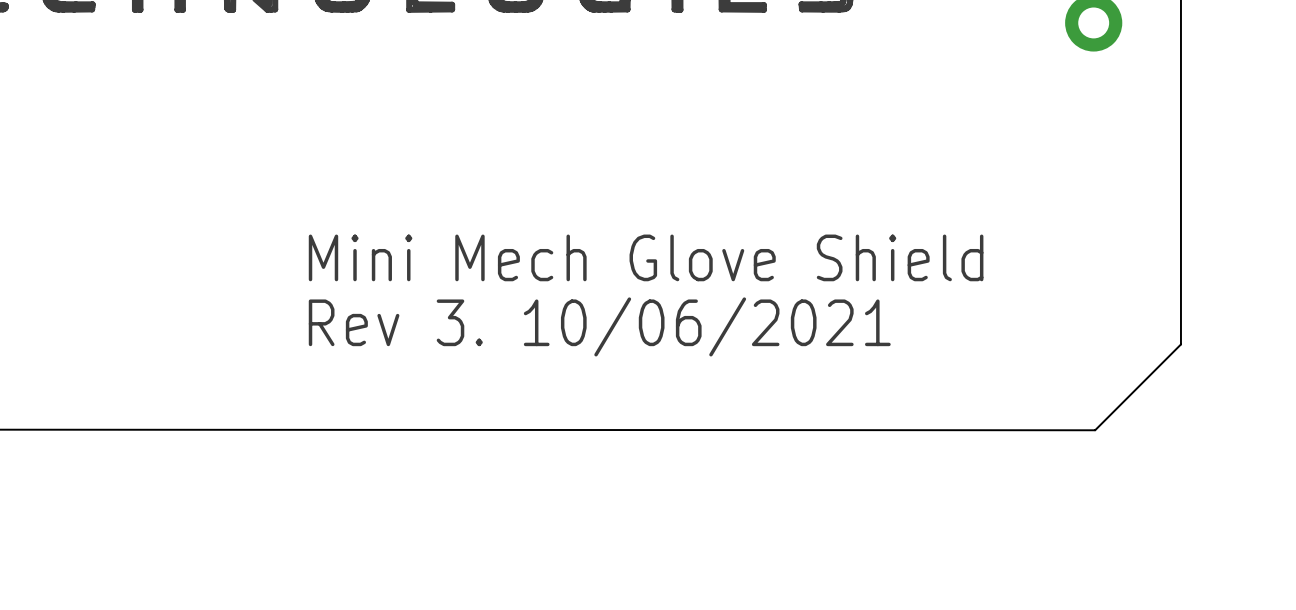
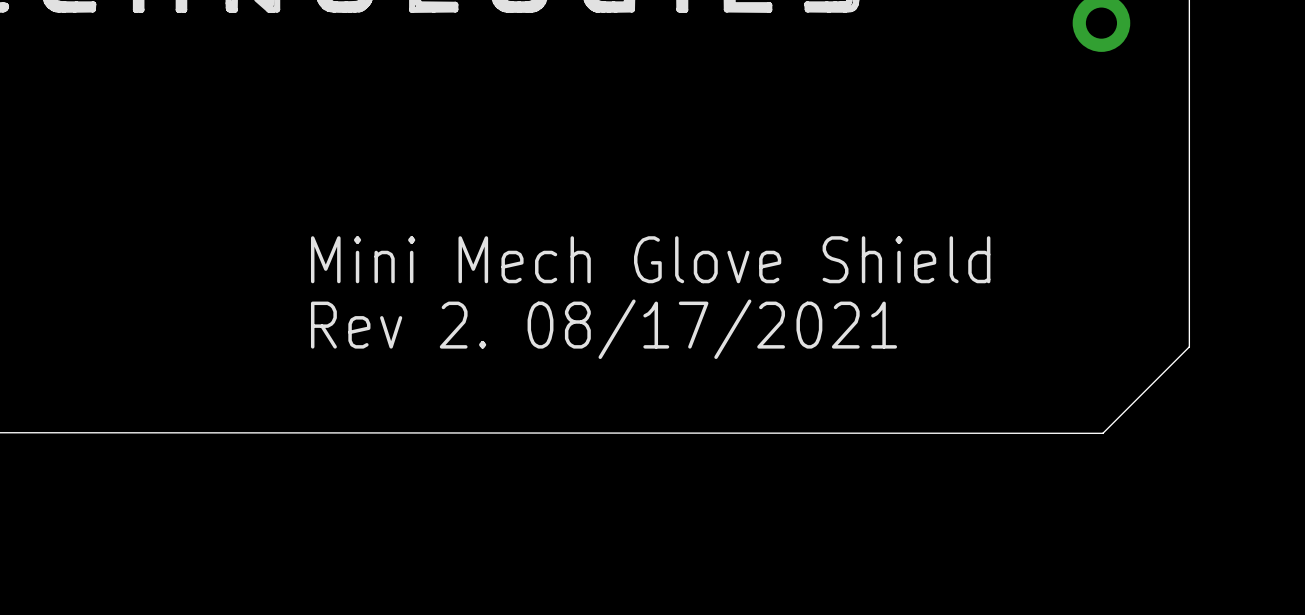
text: Rev 3. 10/06/2021 (599, 326) -> Rev 2. 08/17/2021 (604, 329)

